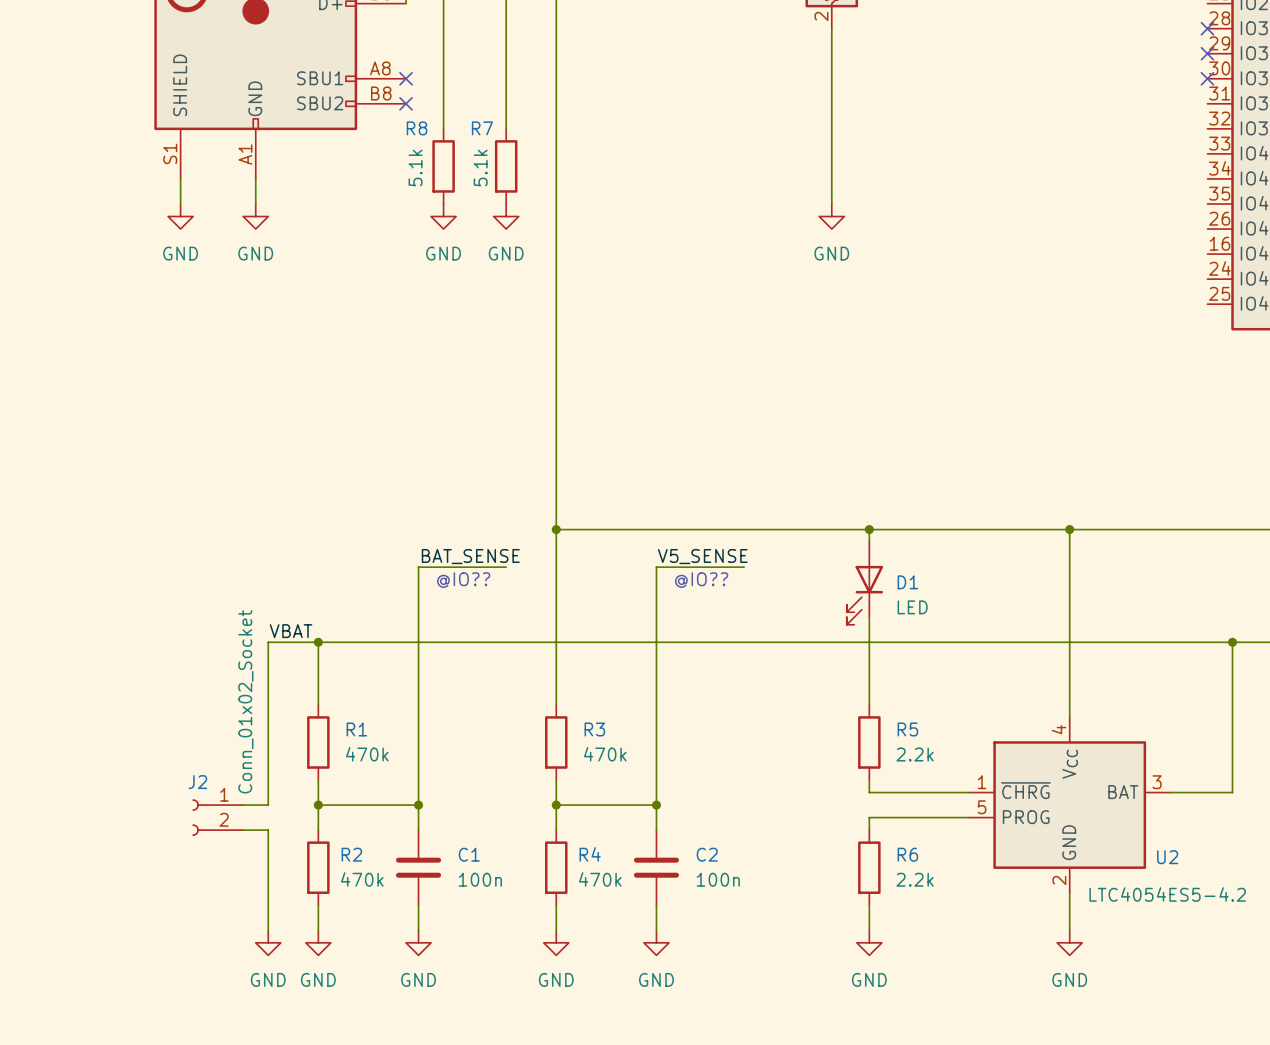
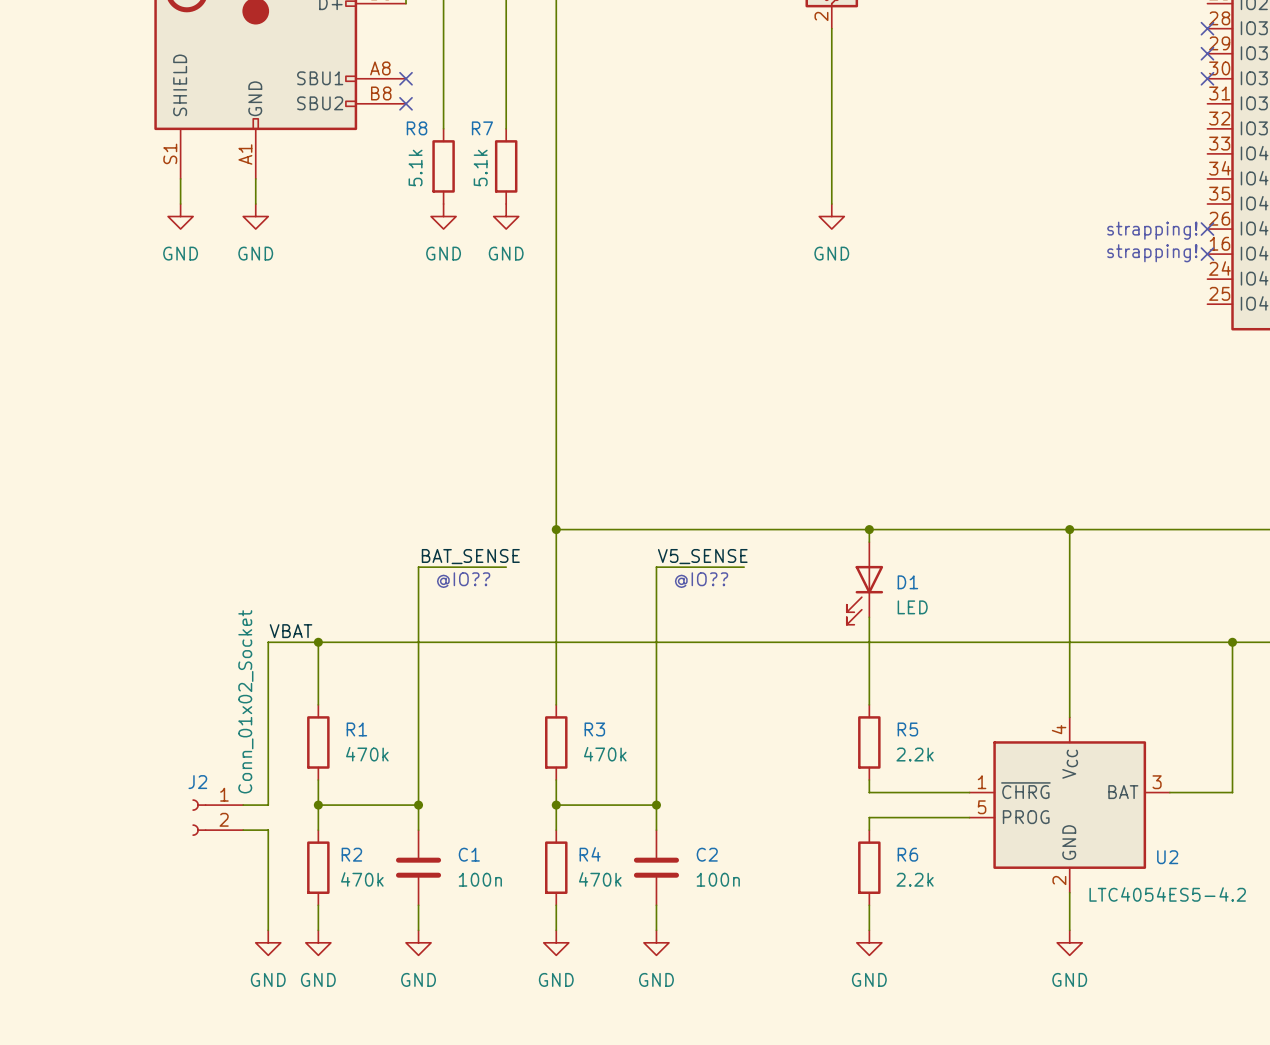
no-connect mark: none -> (1207, 229)
text: none -> strapping! (1152, 230)
text: none -> strapping! (1152, 253)
no-connect mark: none -> (1207, 254)

